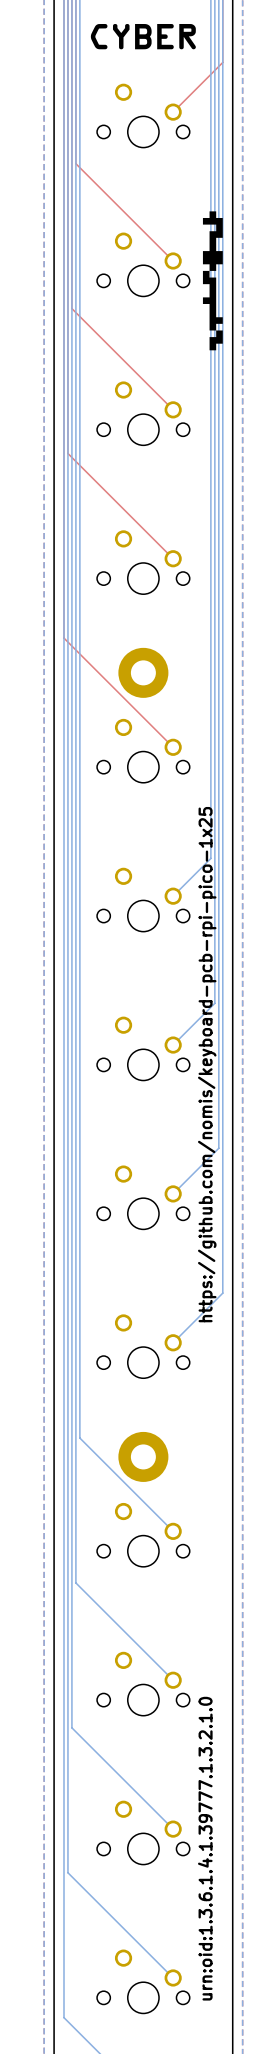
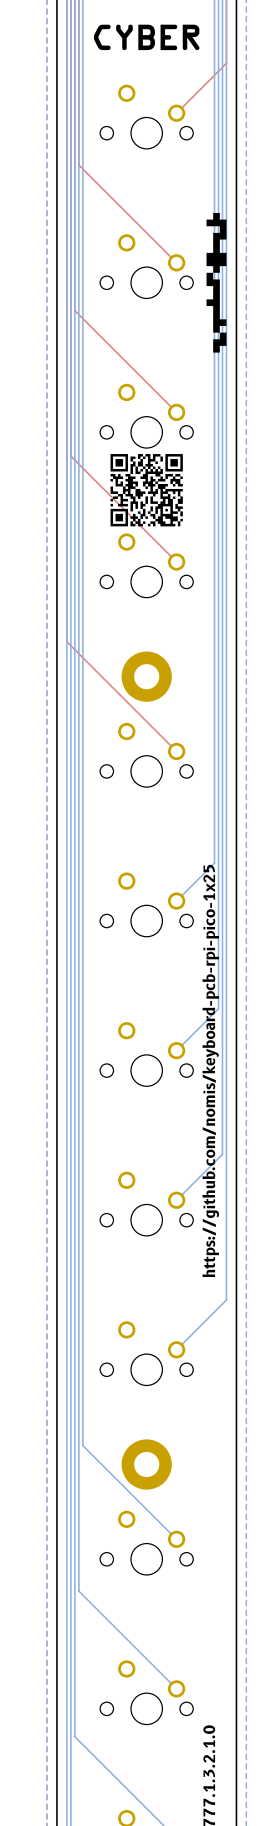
drawing: none -> [110, 454, 183, 527]

